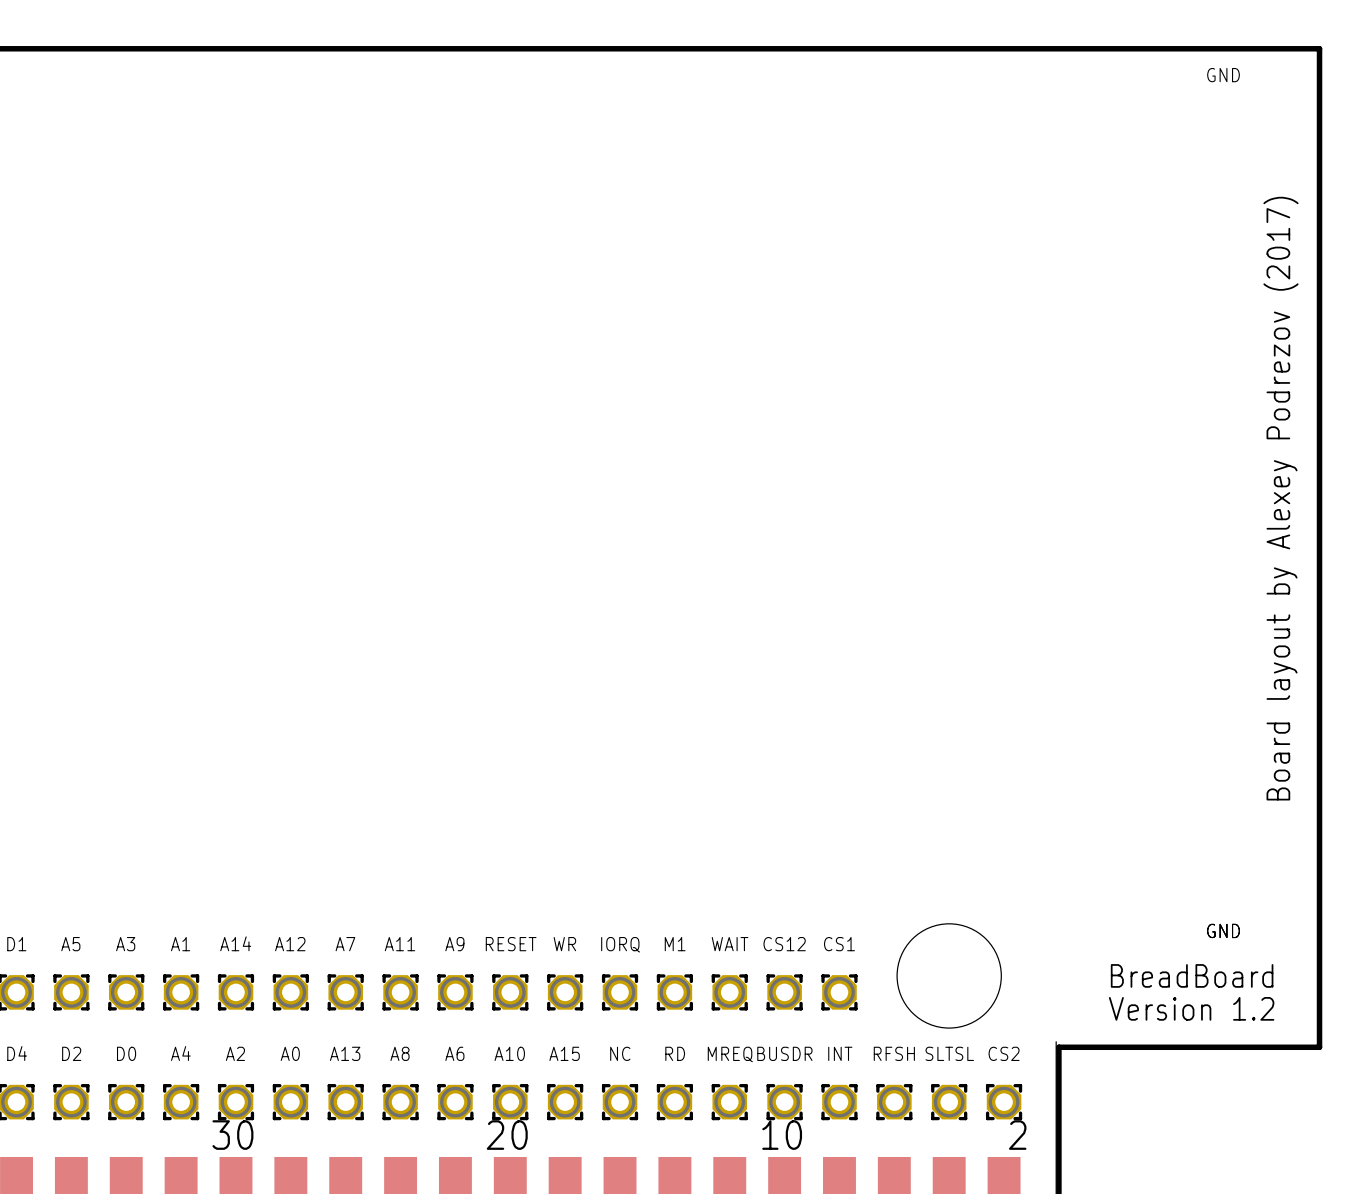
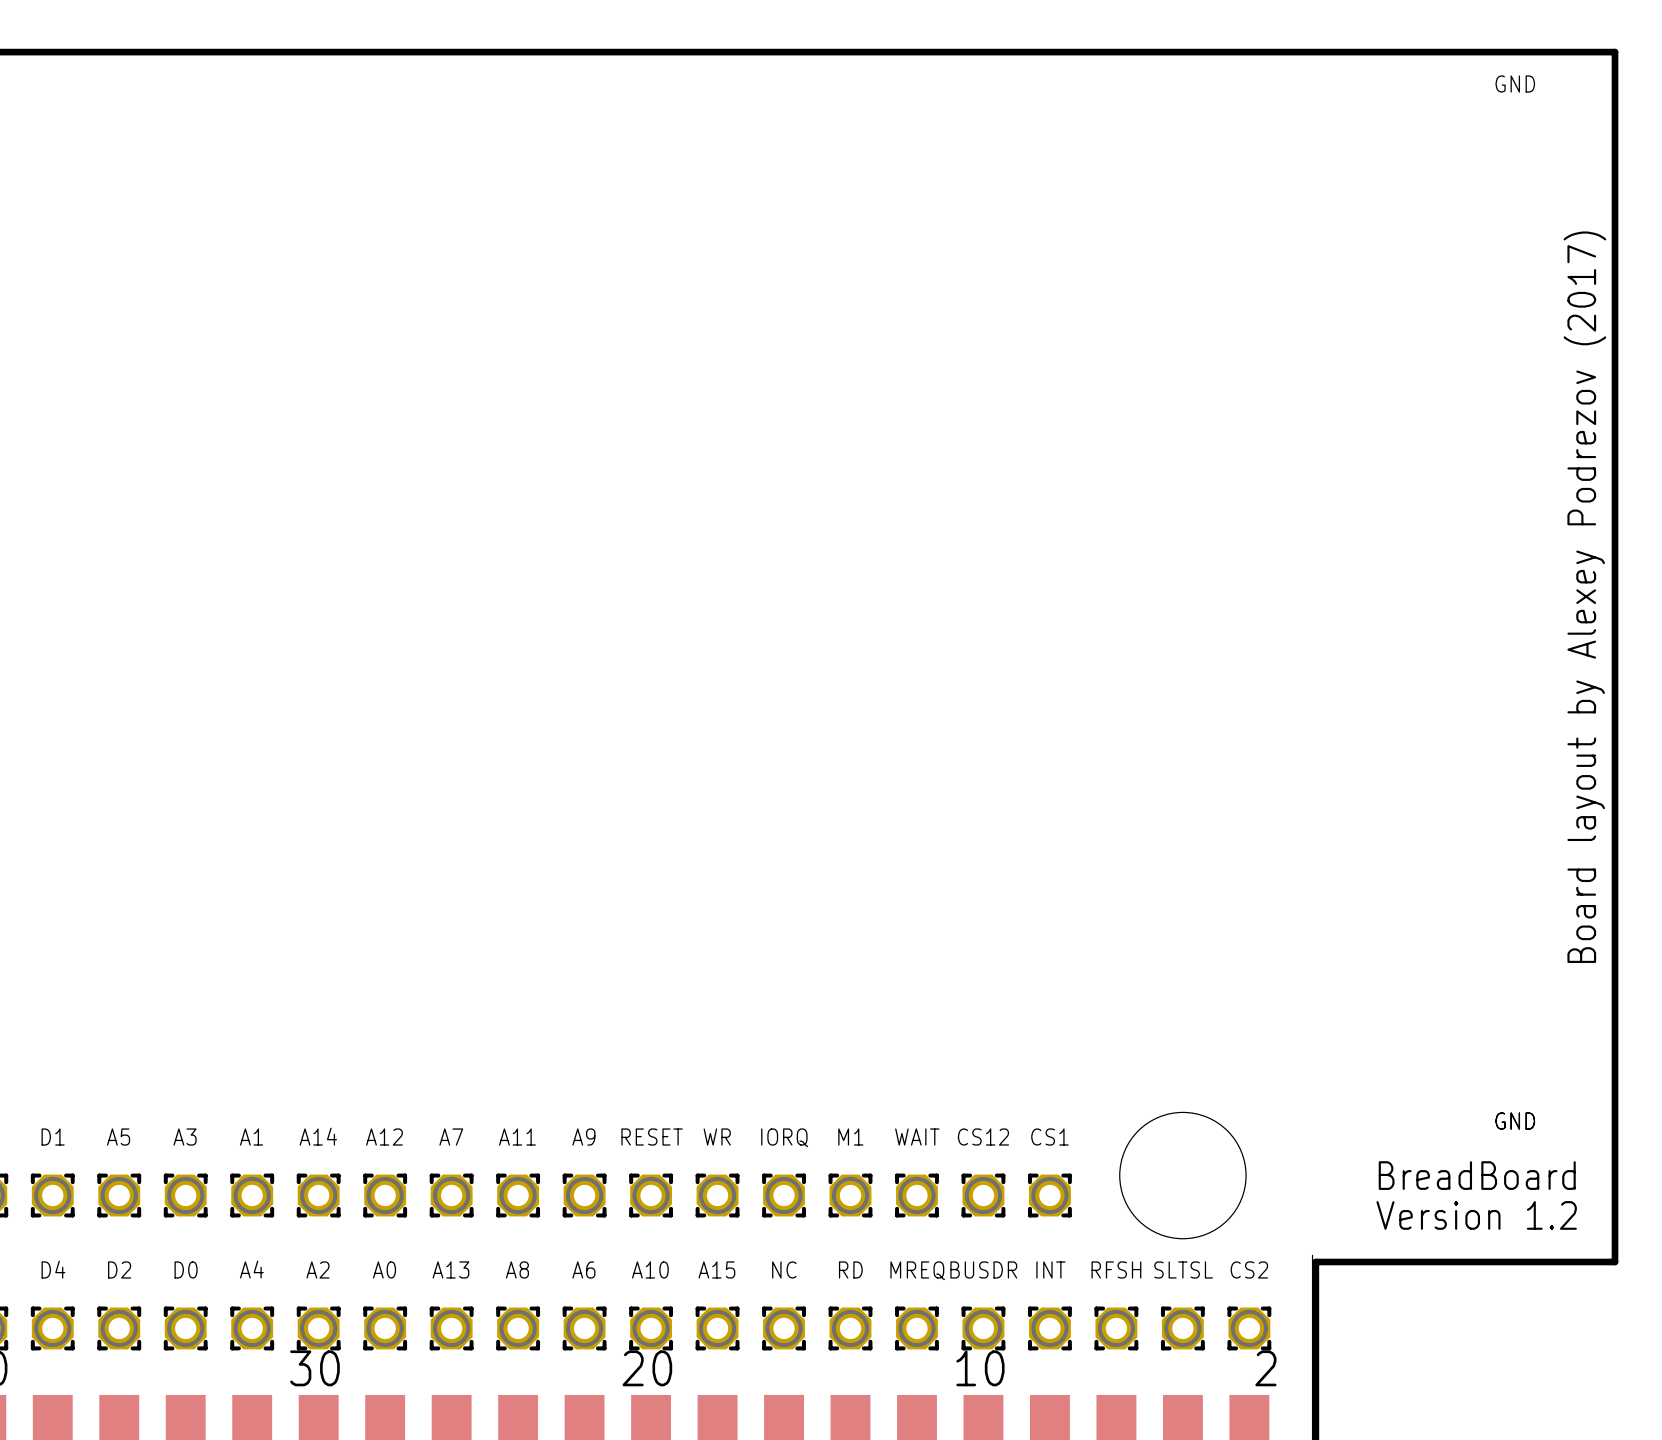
board edge: (1305, 48) (1319, 48) (1319, 1047) (1305, 1047) -> (1615, 52) (1615, 1261)

